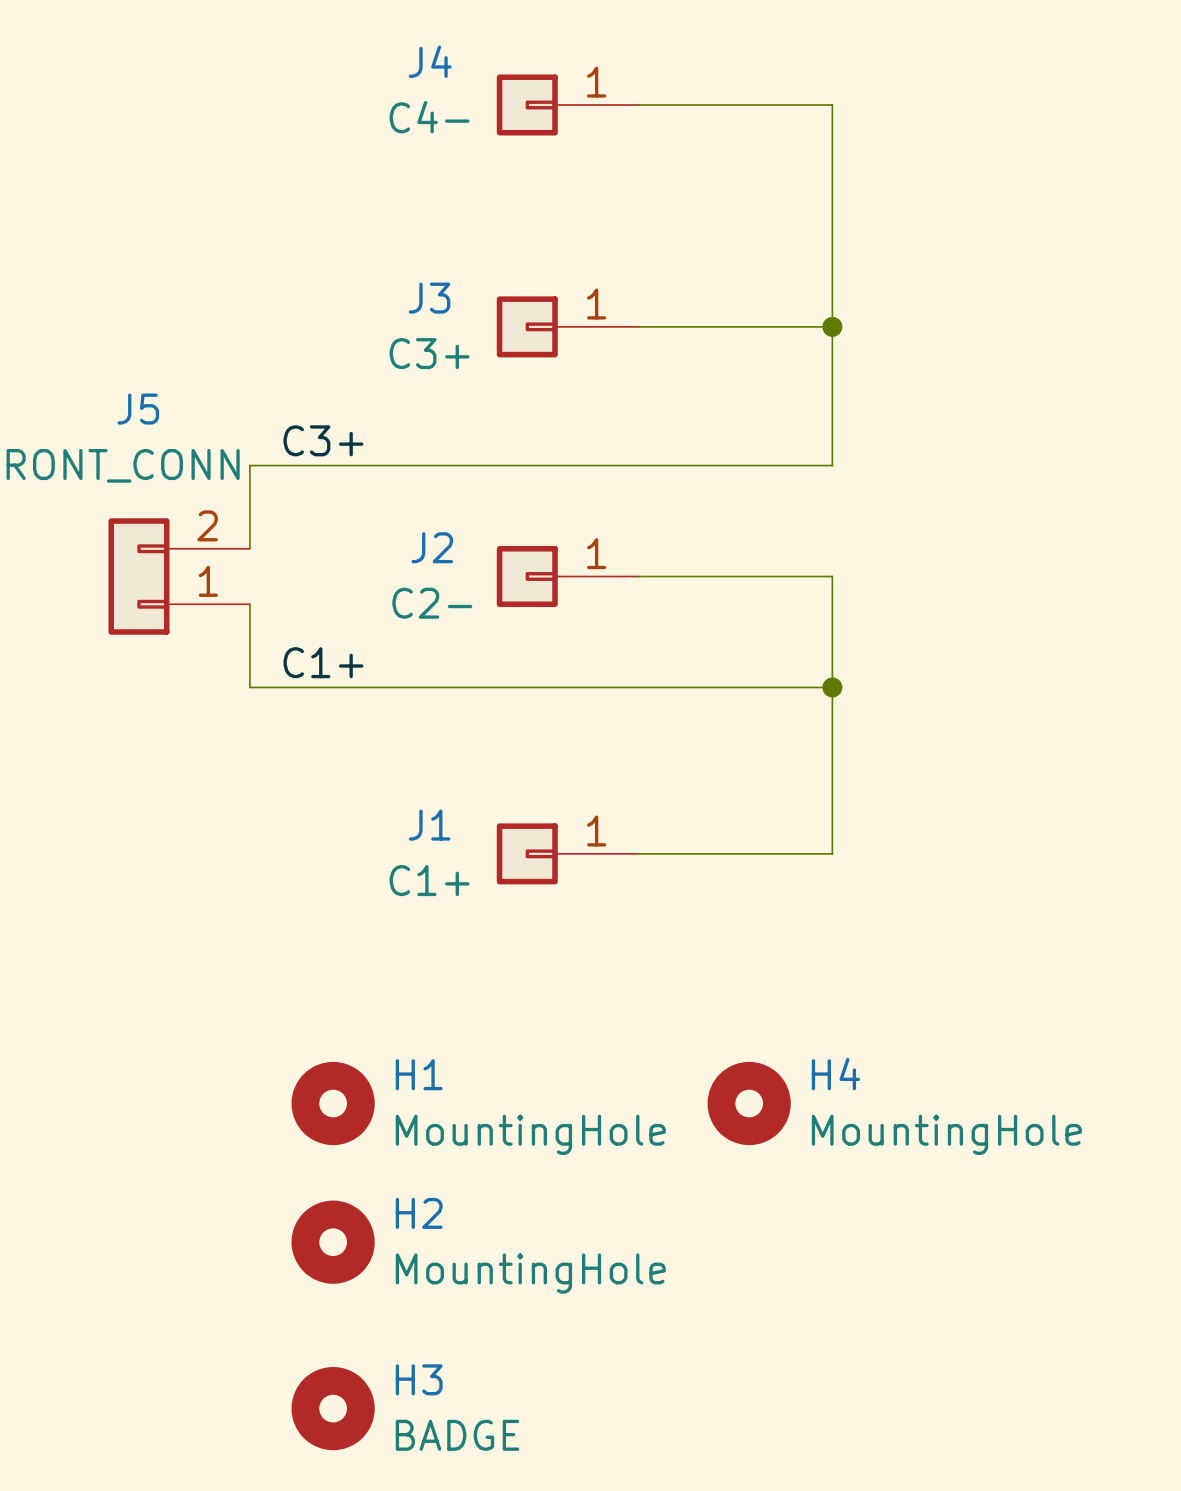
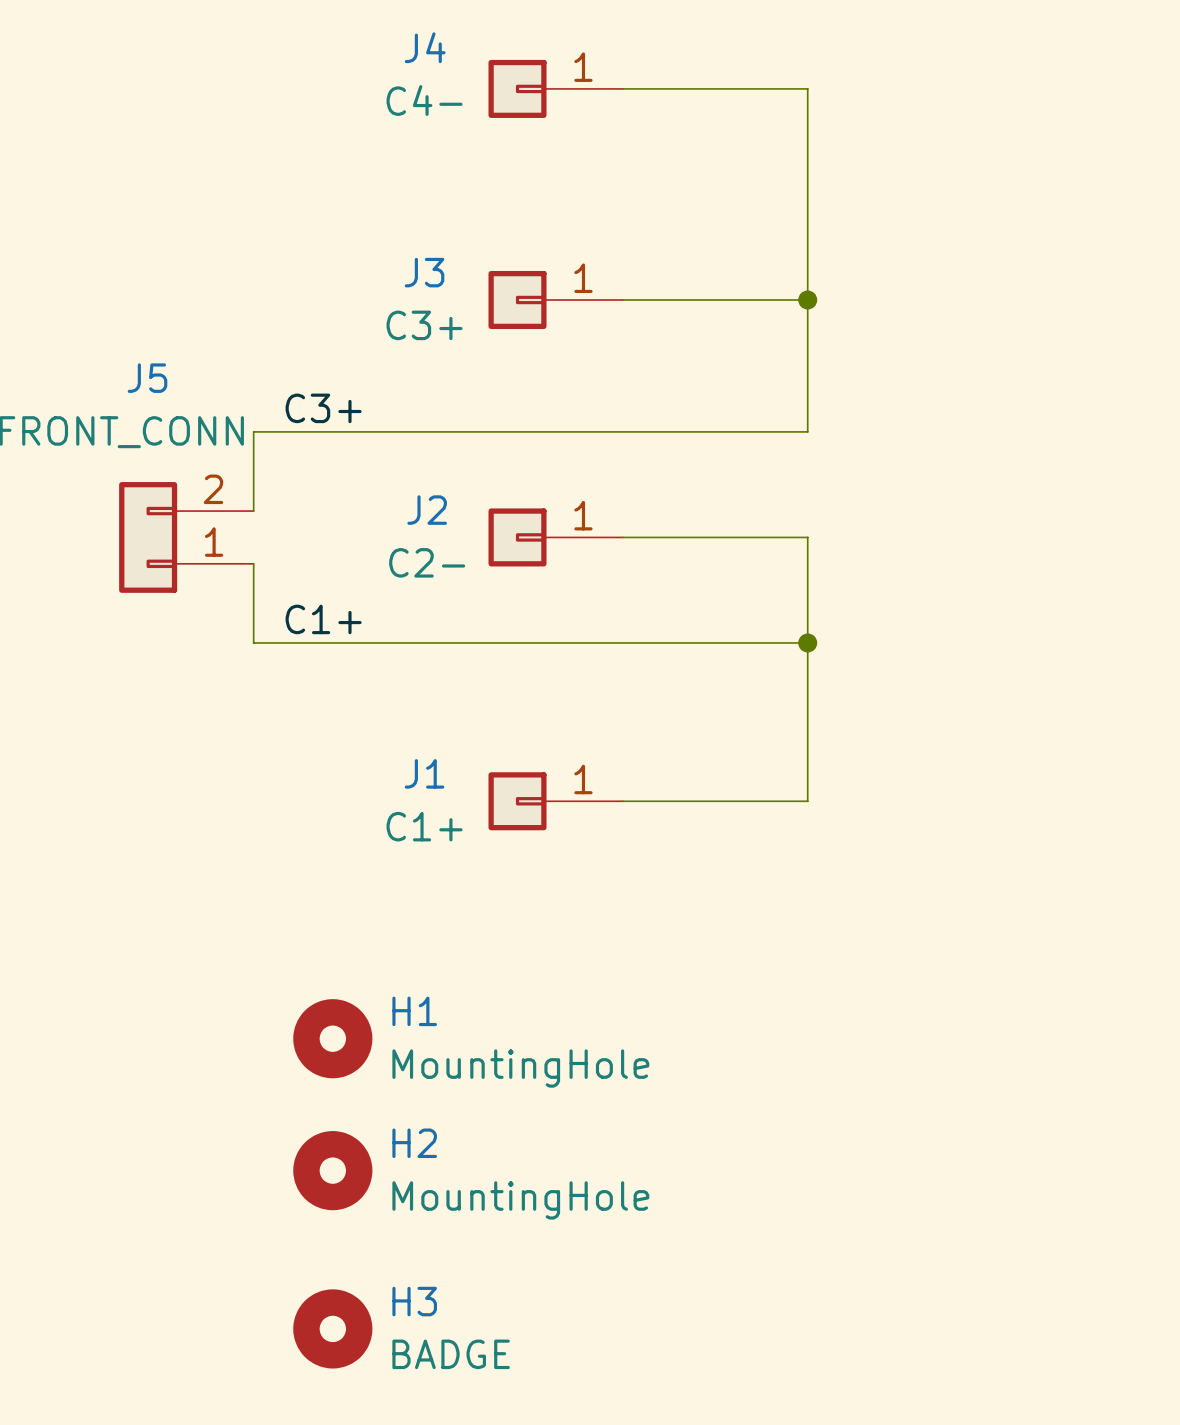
H4: MountingHole (749, 1103) -> none

